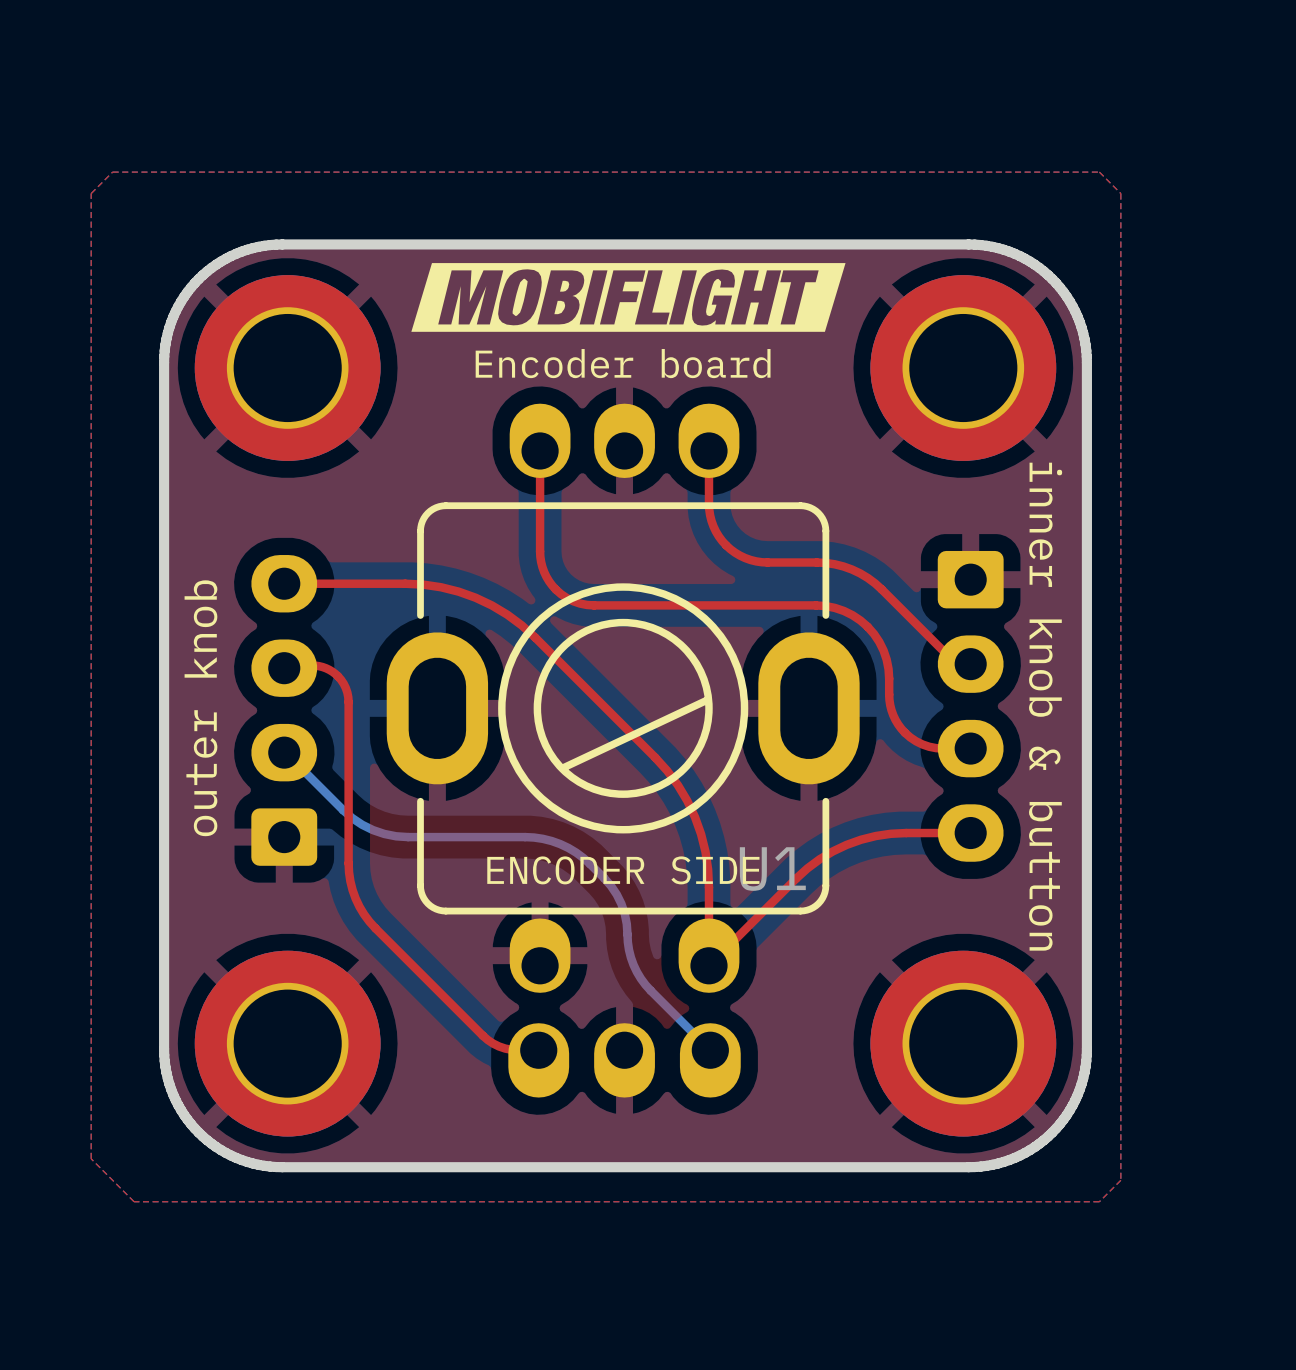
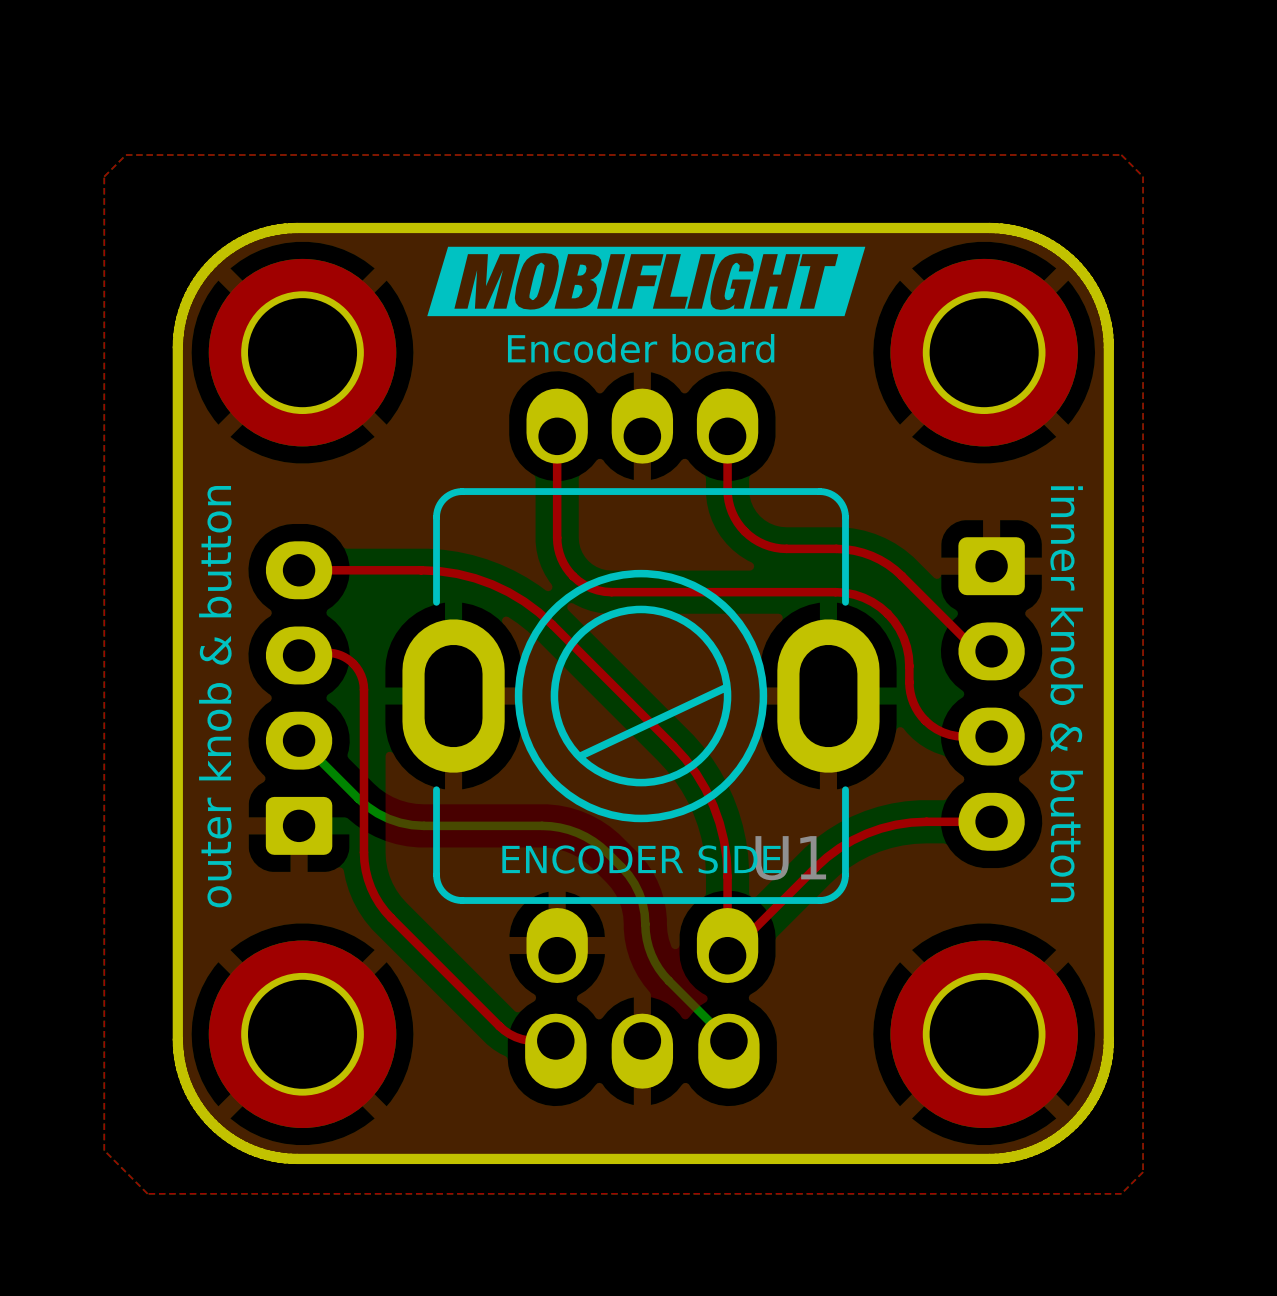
text: outer knob (200, 708) -> outer knob & button (215, 696)

